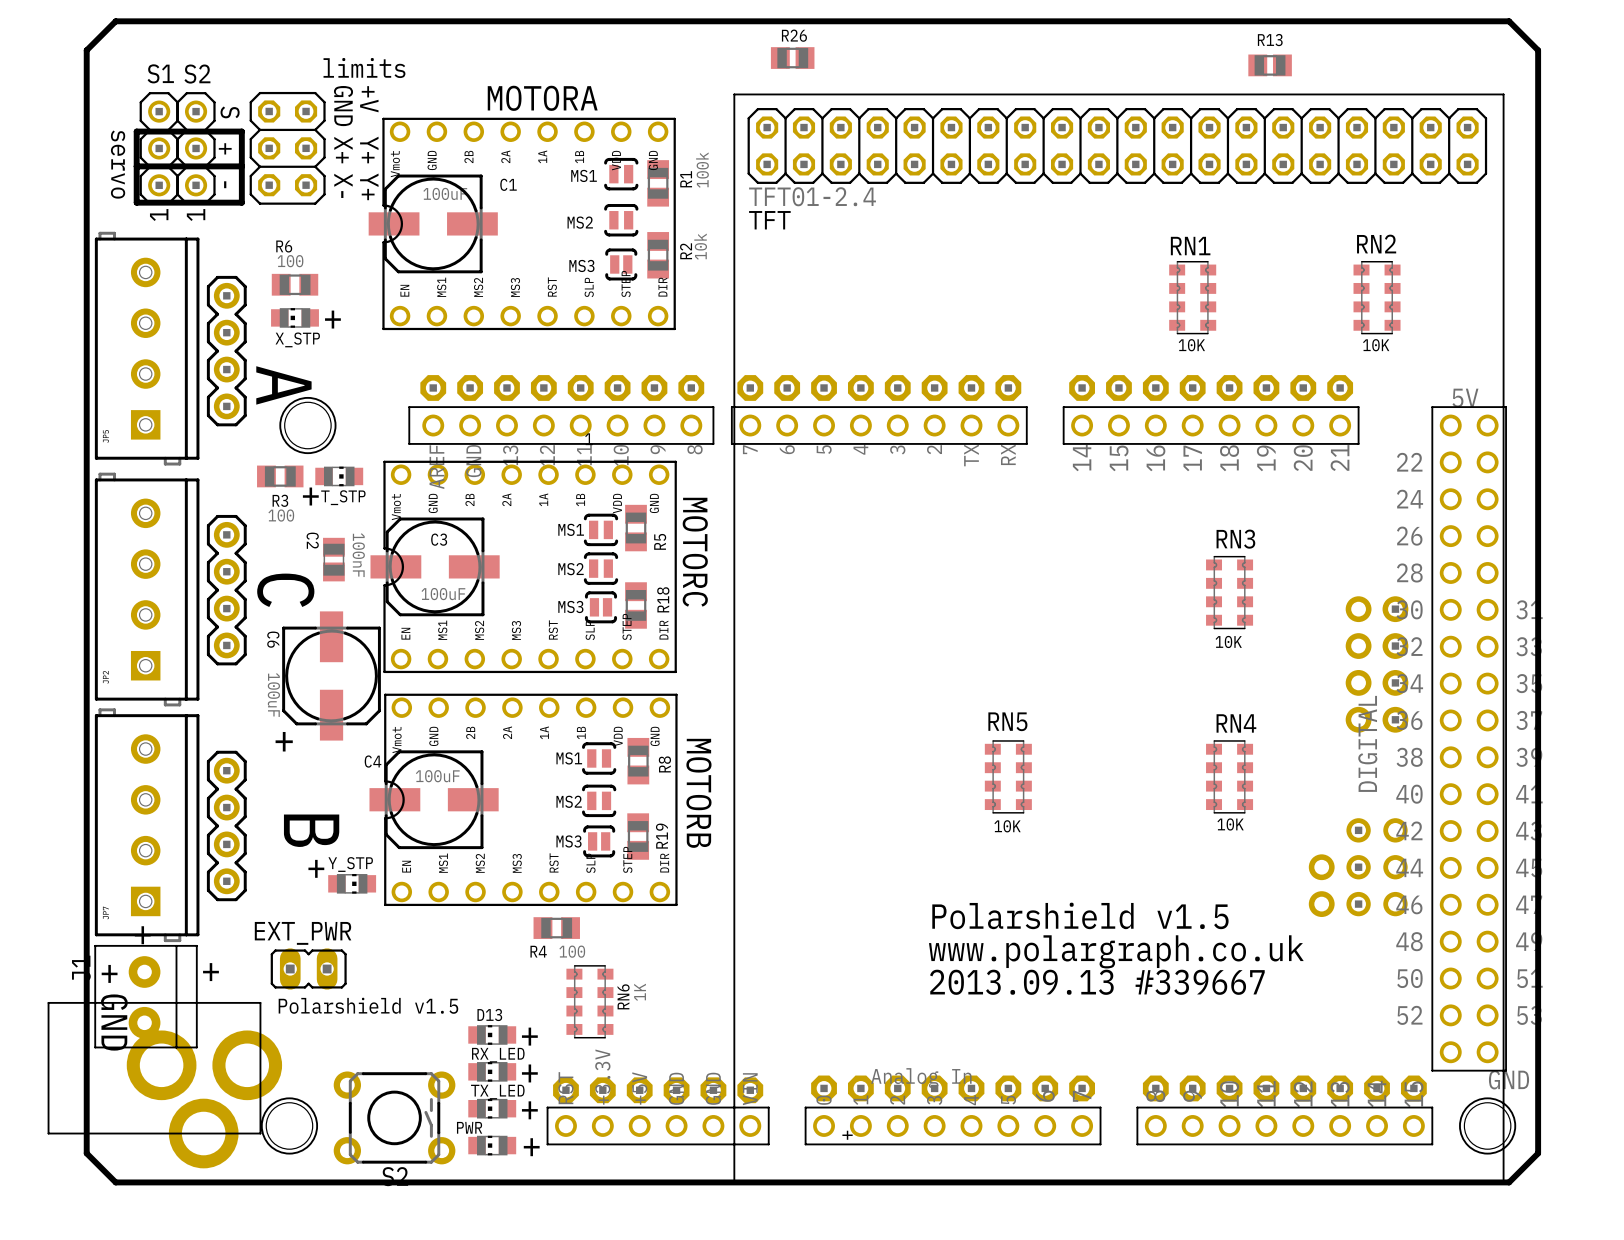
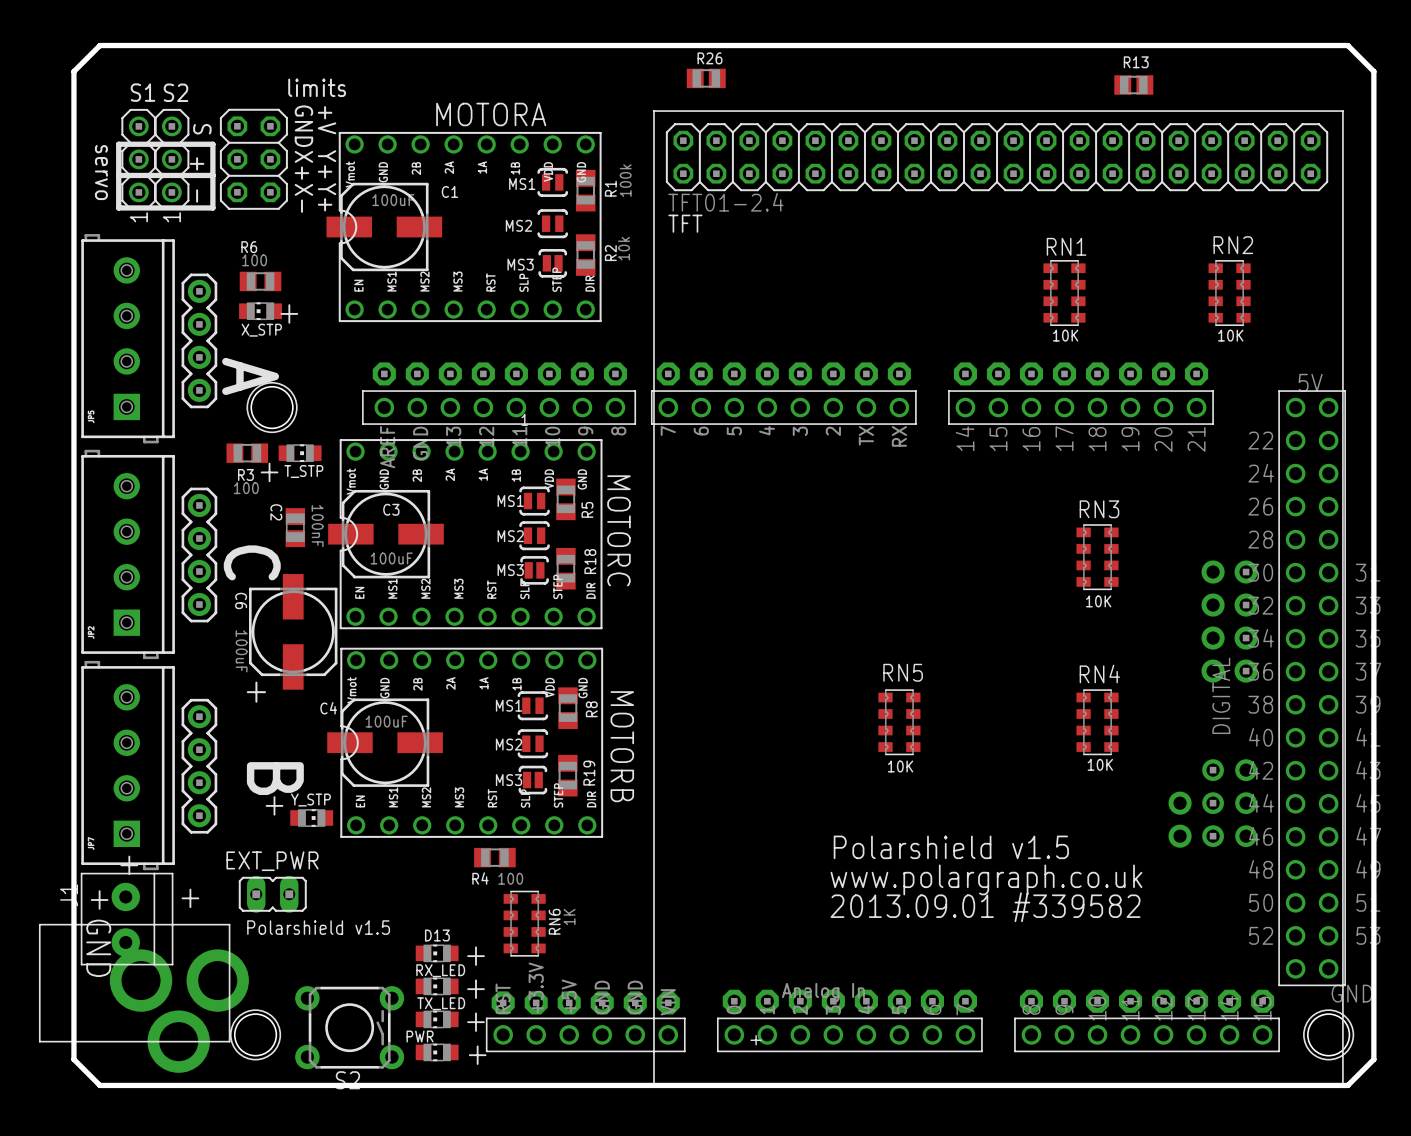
text: 2013.09.13 #339667 (1097, 982) -> 2013.09.01 #339582 (985, 907)

